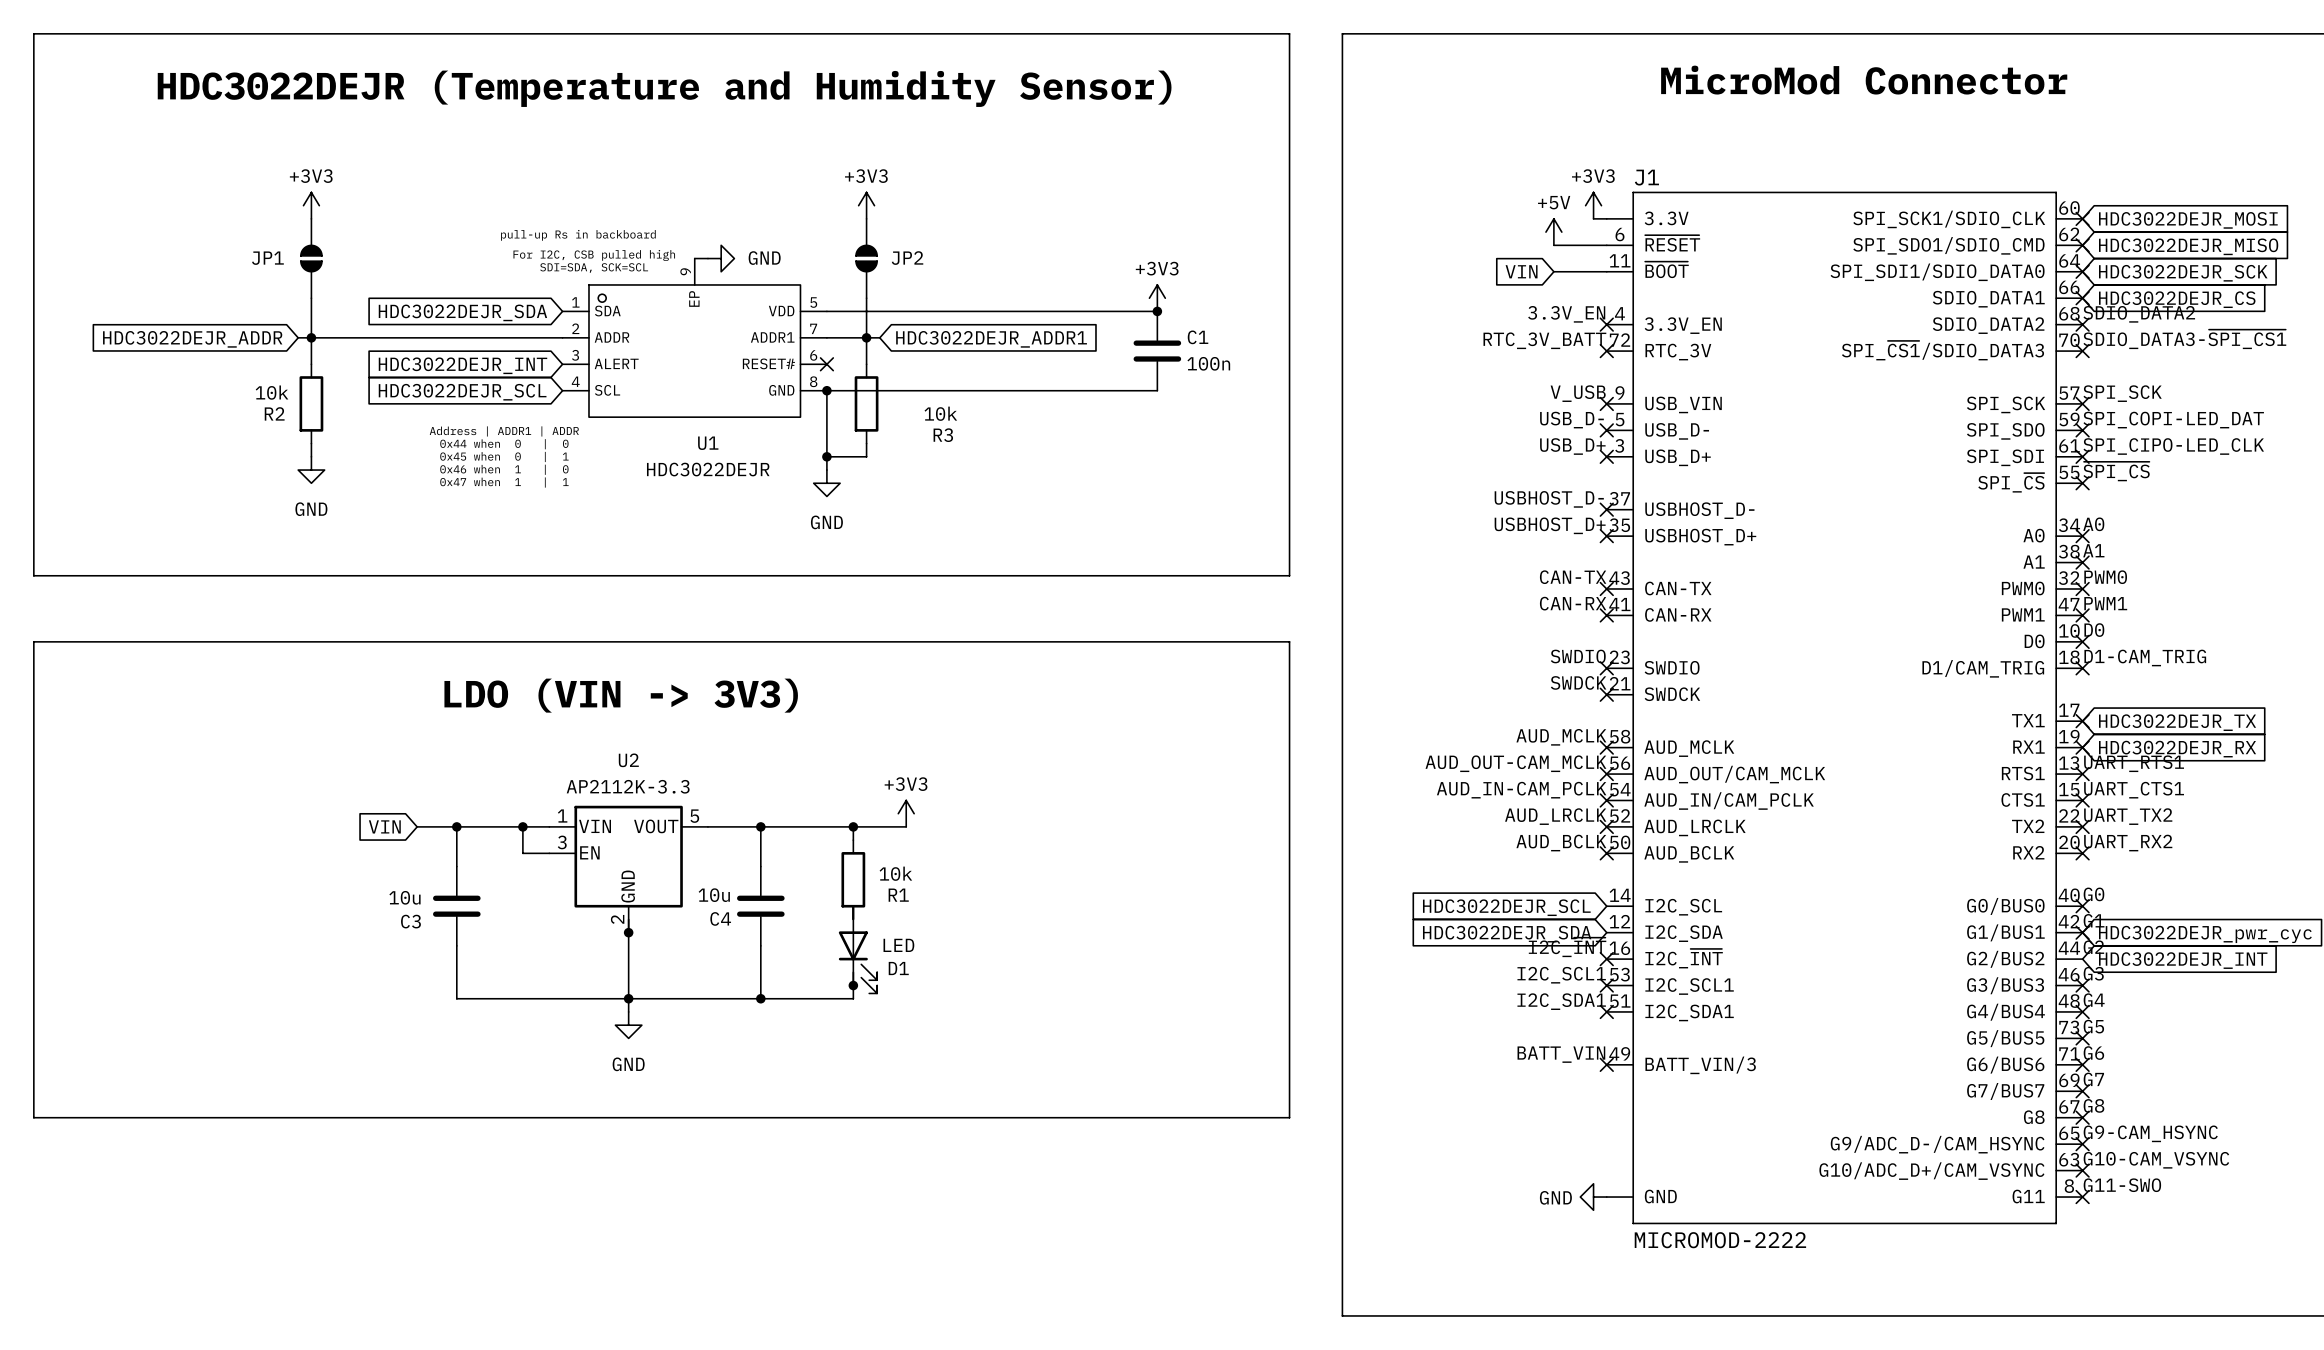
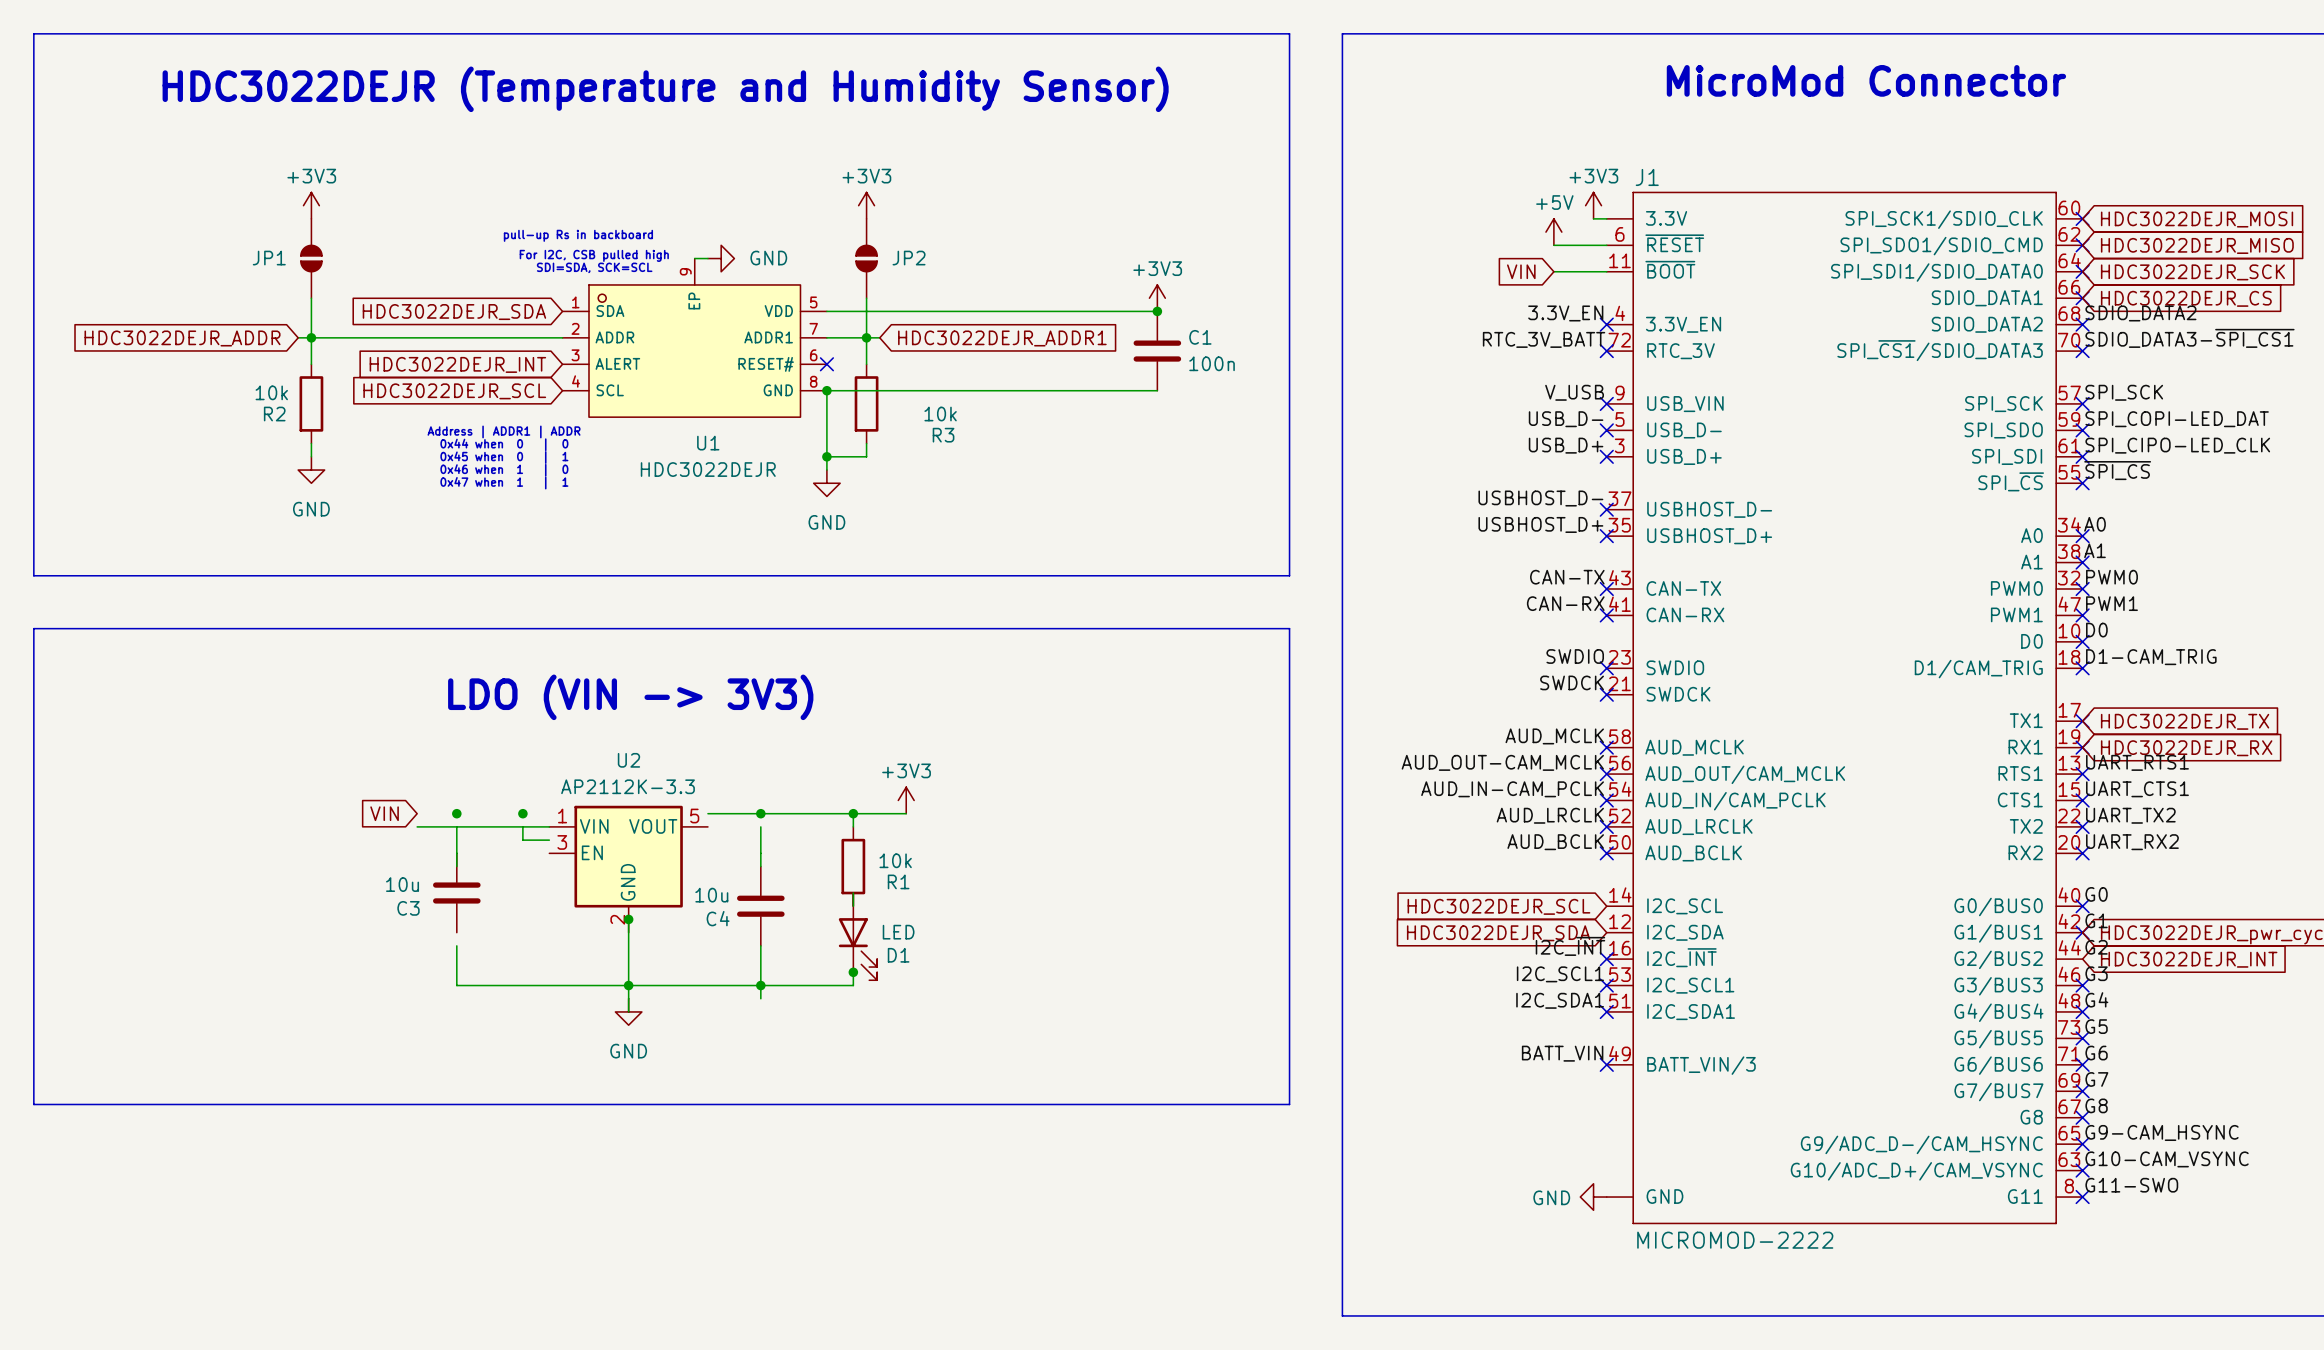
line: (33, 641) (1289, 641) -> (33, 641) (33, 628) (1289, 628) (1289, 641)
power symbol position: +3V3 (906, 813) -> +3V3 (906, 800)
global label position: VIN (384, 826) -> VIN (384, 813)
junction position: (456, 826) -> (456, 813)
junction position: (522, 826) -> (522, 813)
wire: (707, 826) (906, 826) -> (707, 813) (906, 813)
junction position: (760, 826) -> (760, 813)
junction position: (853, 826) -> (853, 813)
wire: (522, 840) (522, 853) (549, 853) -> (522, 840) (549, 840)
R1 position: (853, 879) -> (853, 866)
C3 position: (456, 906) -> (456, 893)
junction position: (628, 932) -> (628, 919)
D1 position: (857, 949) -> (857, 936)
wire: (456, 985) (456, 998) (853, 998) (853, 985) -> (456, 985) (853, 985)
junction position: (853, 985) -> (853, 972)
junction position: (628, 998) -> (628, 985)
junction position: (760, 998) -> (760, 985)
power symbol position: GND (628, 1025) -> GND (628, 1011)
line: (33, 1104) (33, 1117) (1289, 1117) (1289, 1104) -> (33, 1104) (1289, 1104)

